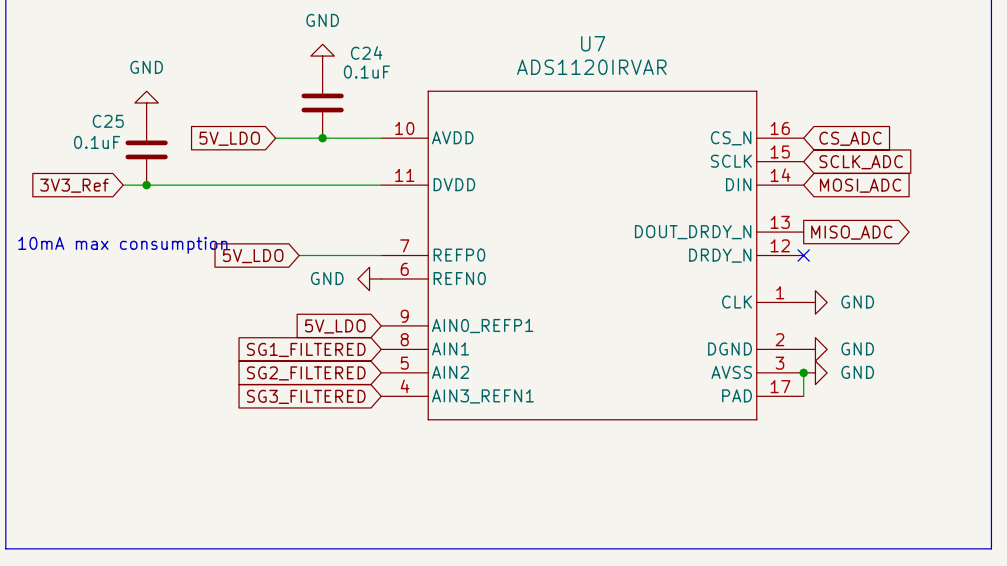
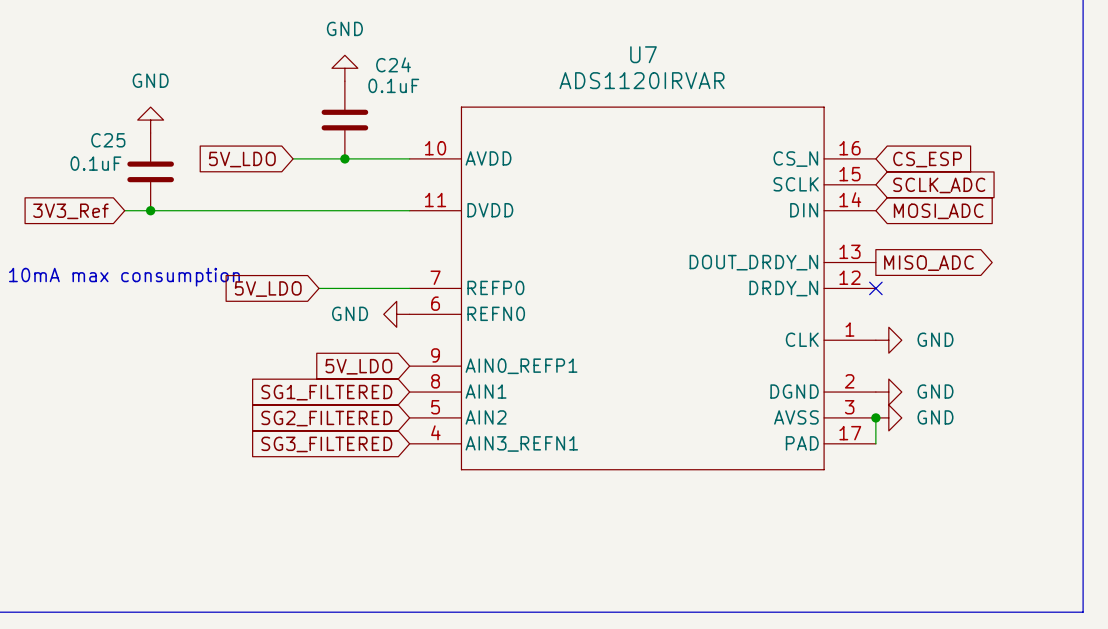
global label: CS_ADC (850, 138) -> CS_ESP (927, 159)

